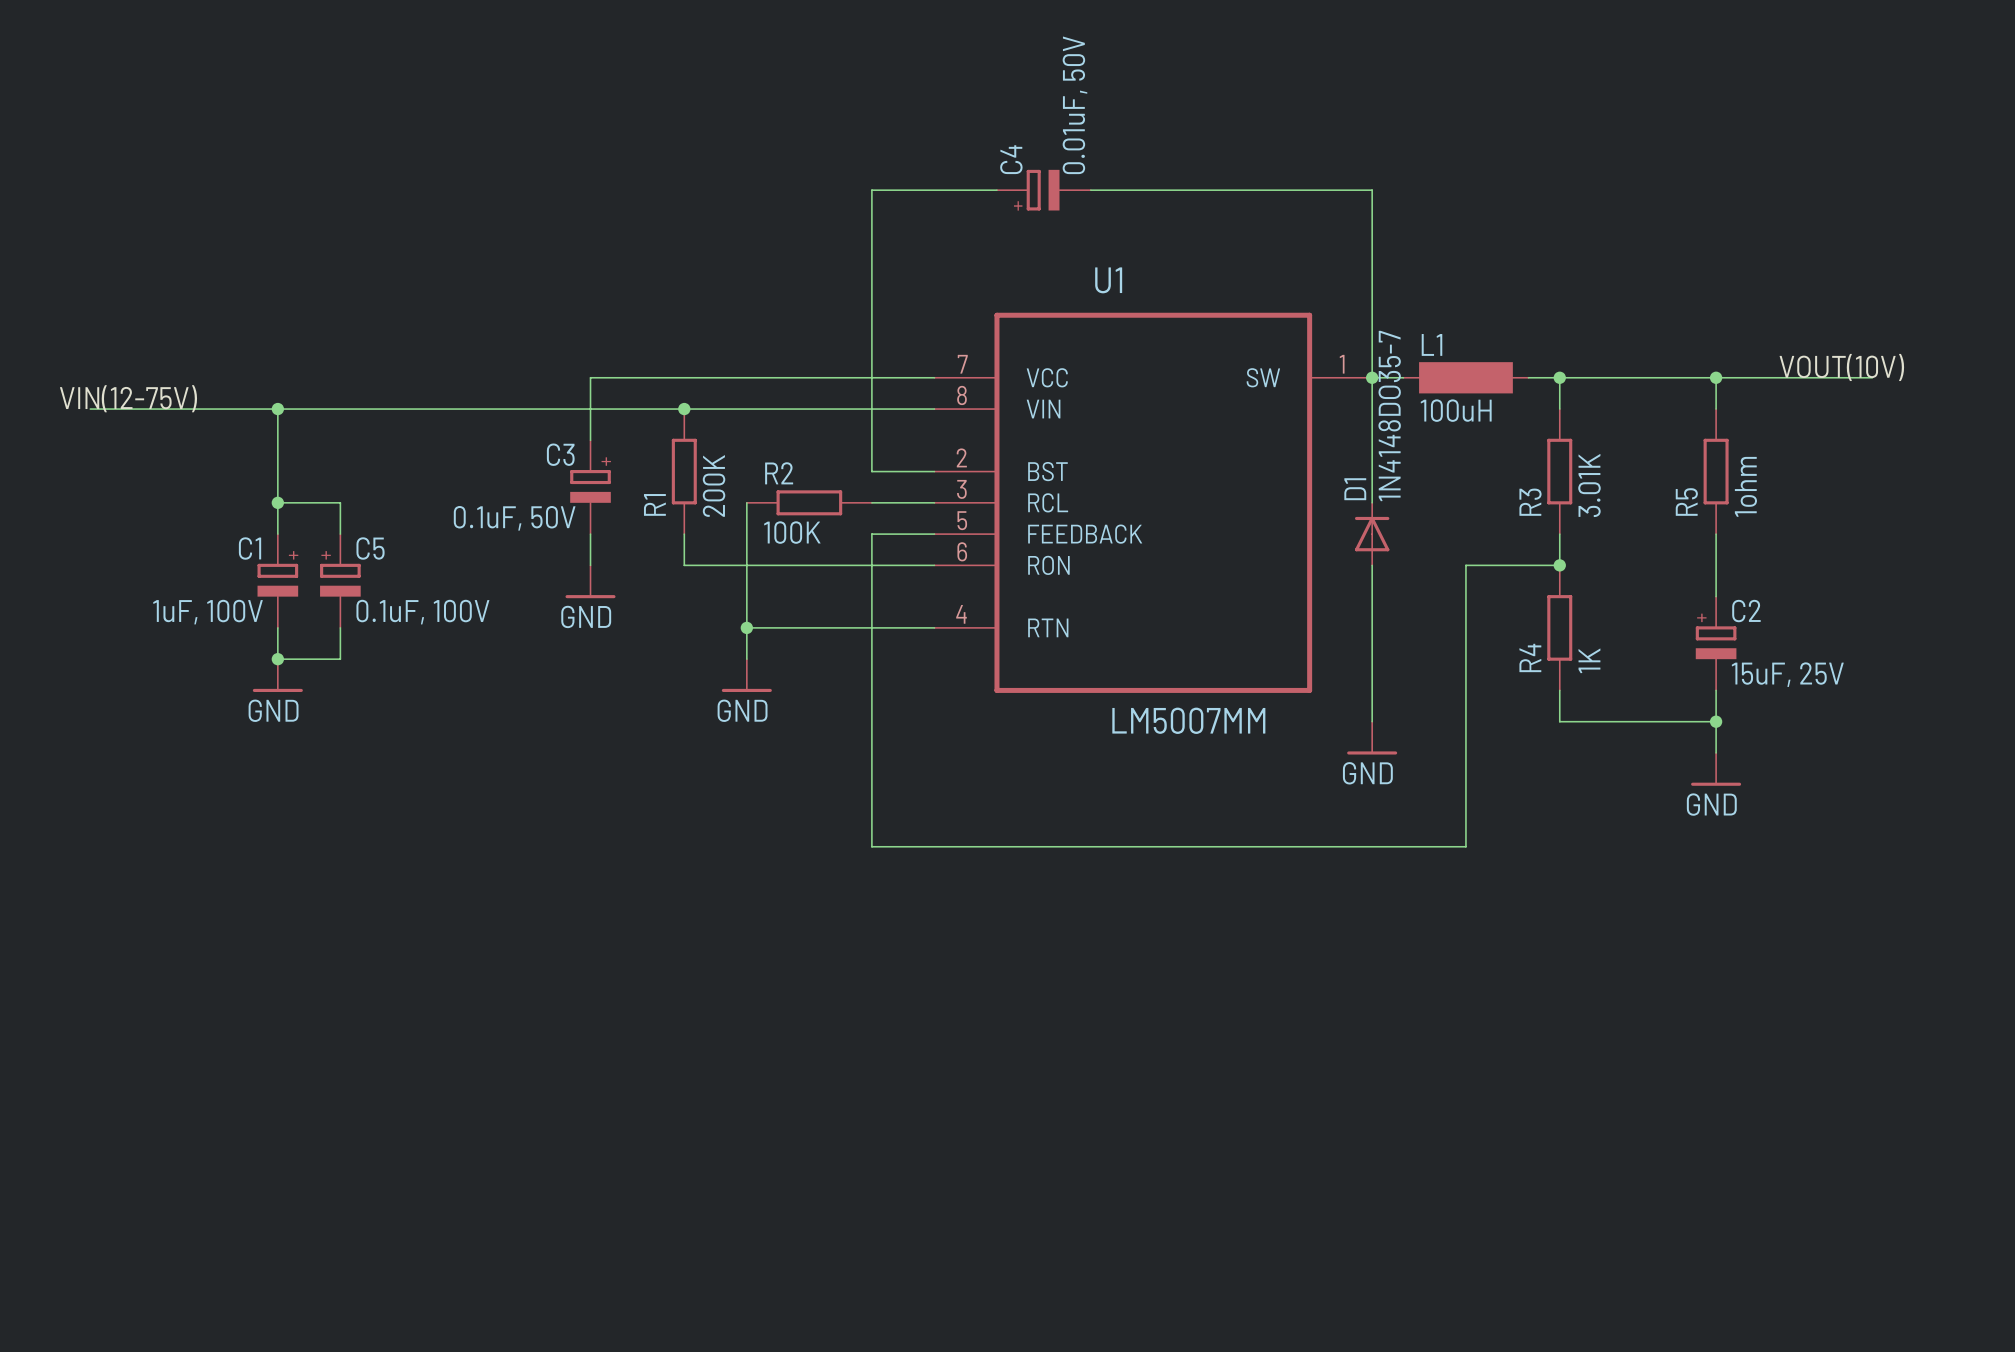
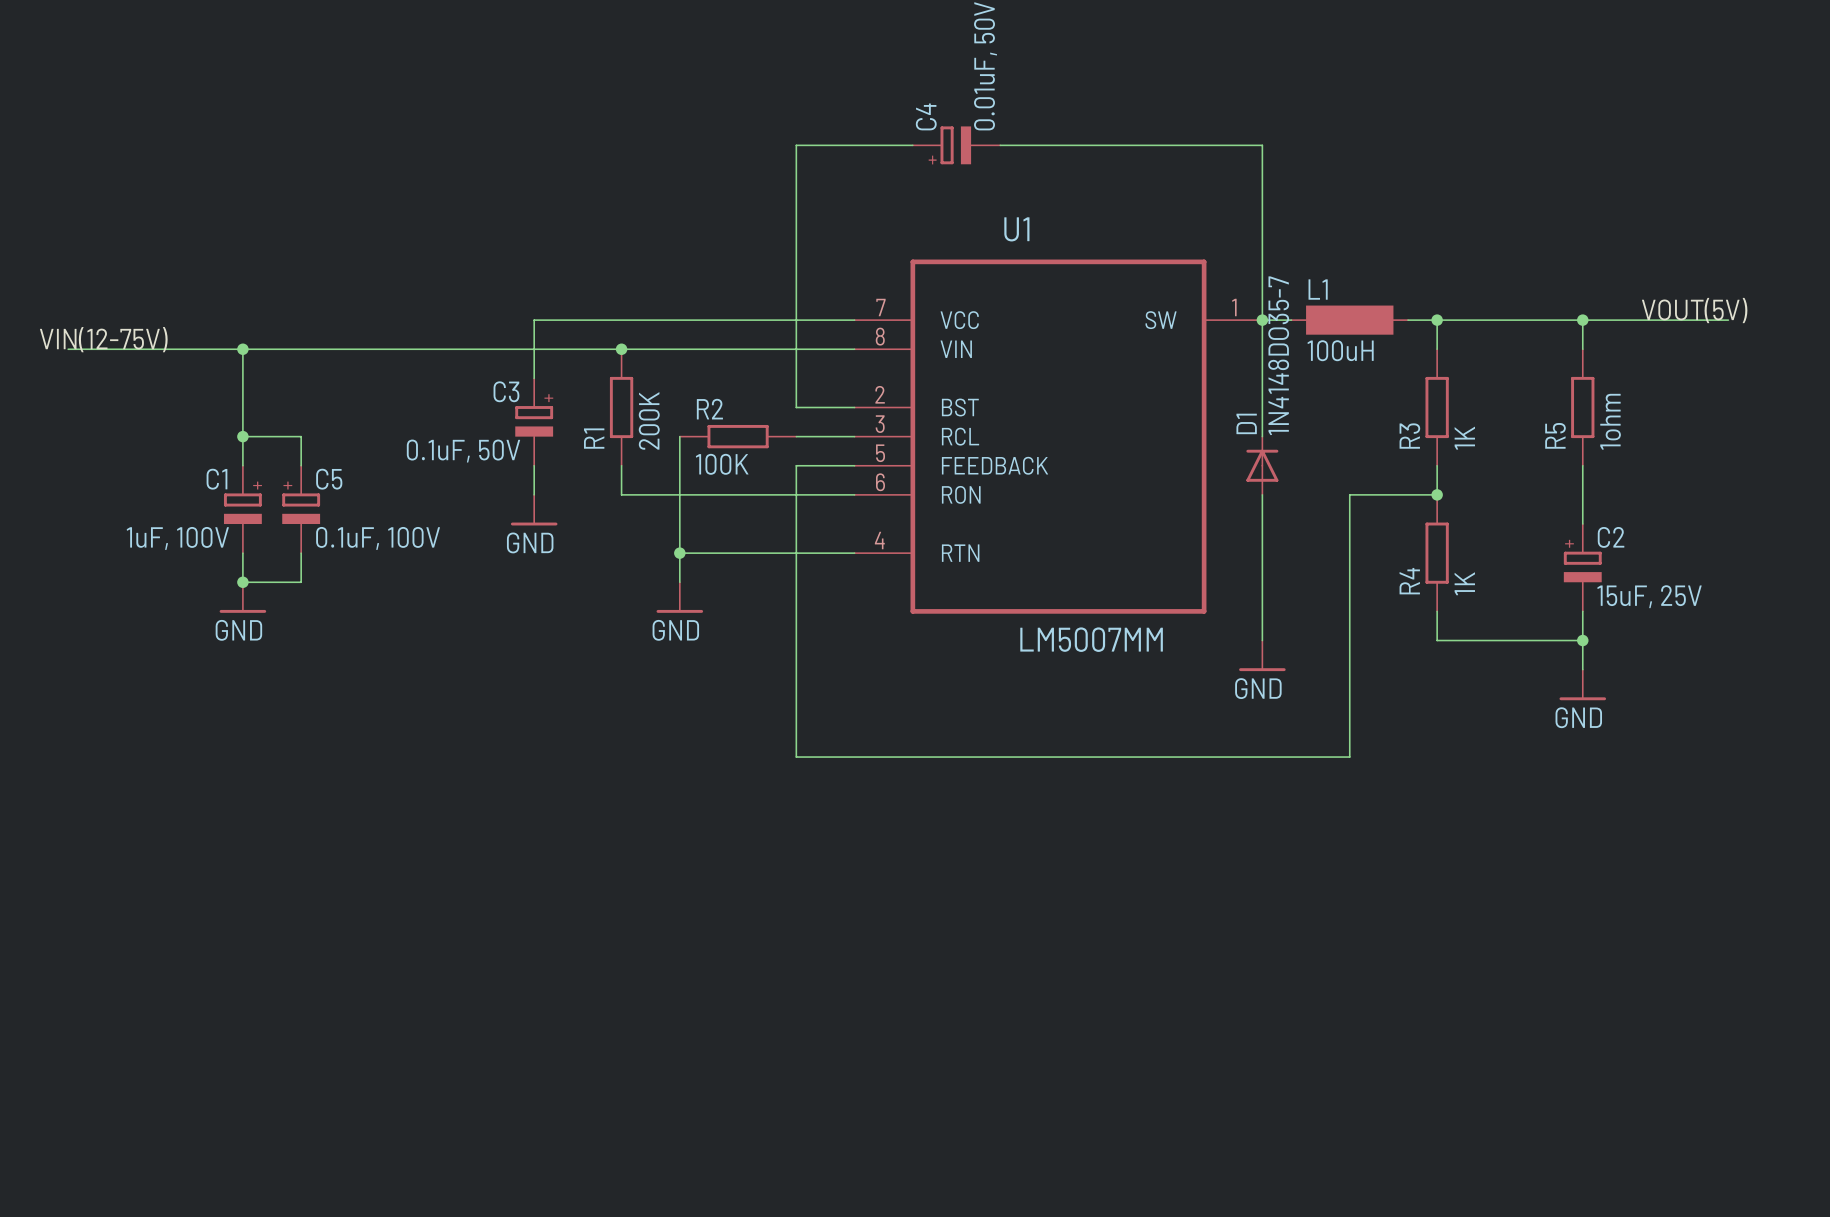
label: VOUT(10V) (1841, 367) -> VOUT(5V) (1694, 310)
R3 value: 3.01K (1589, 485) -> 1K (1464, 438)

